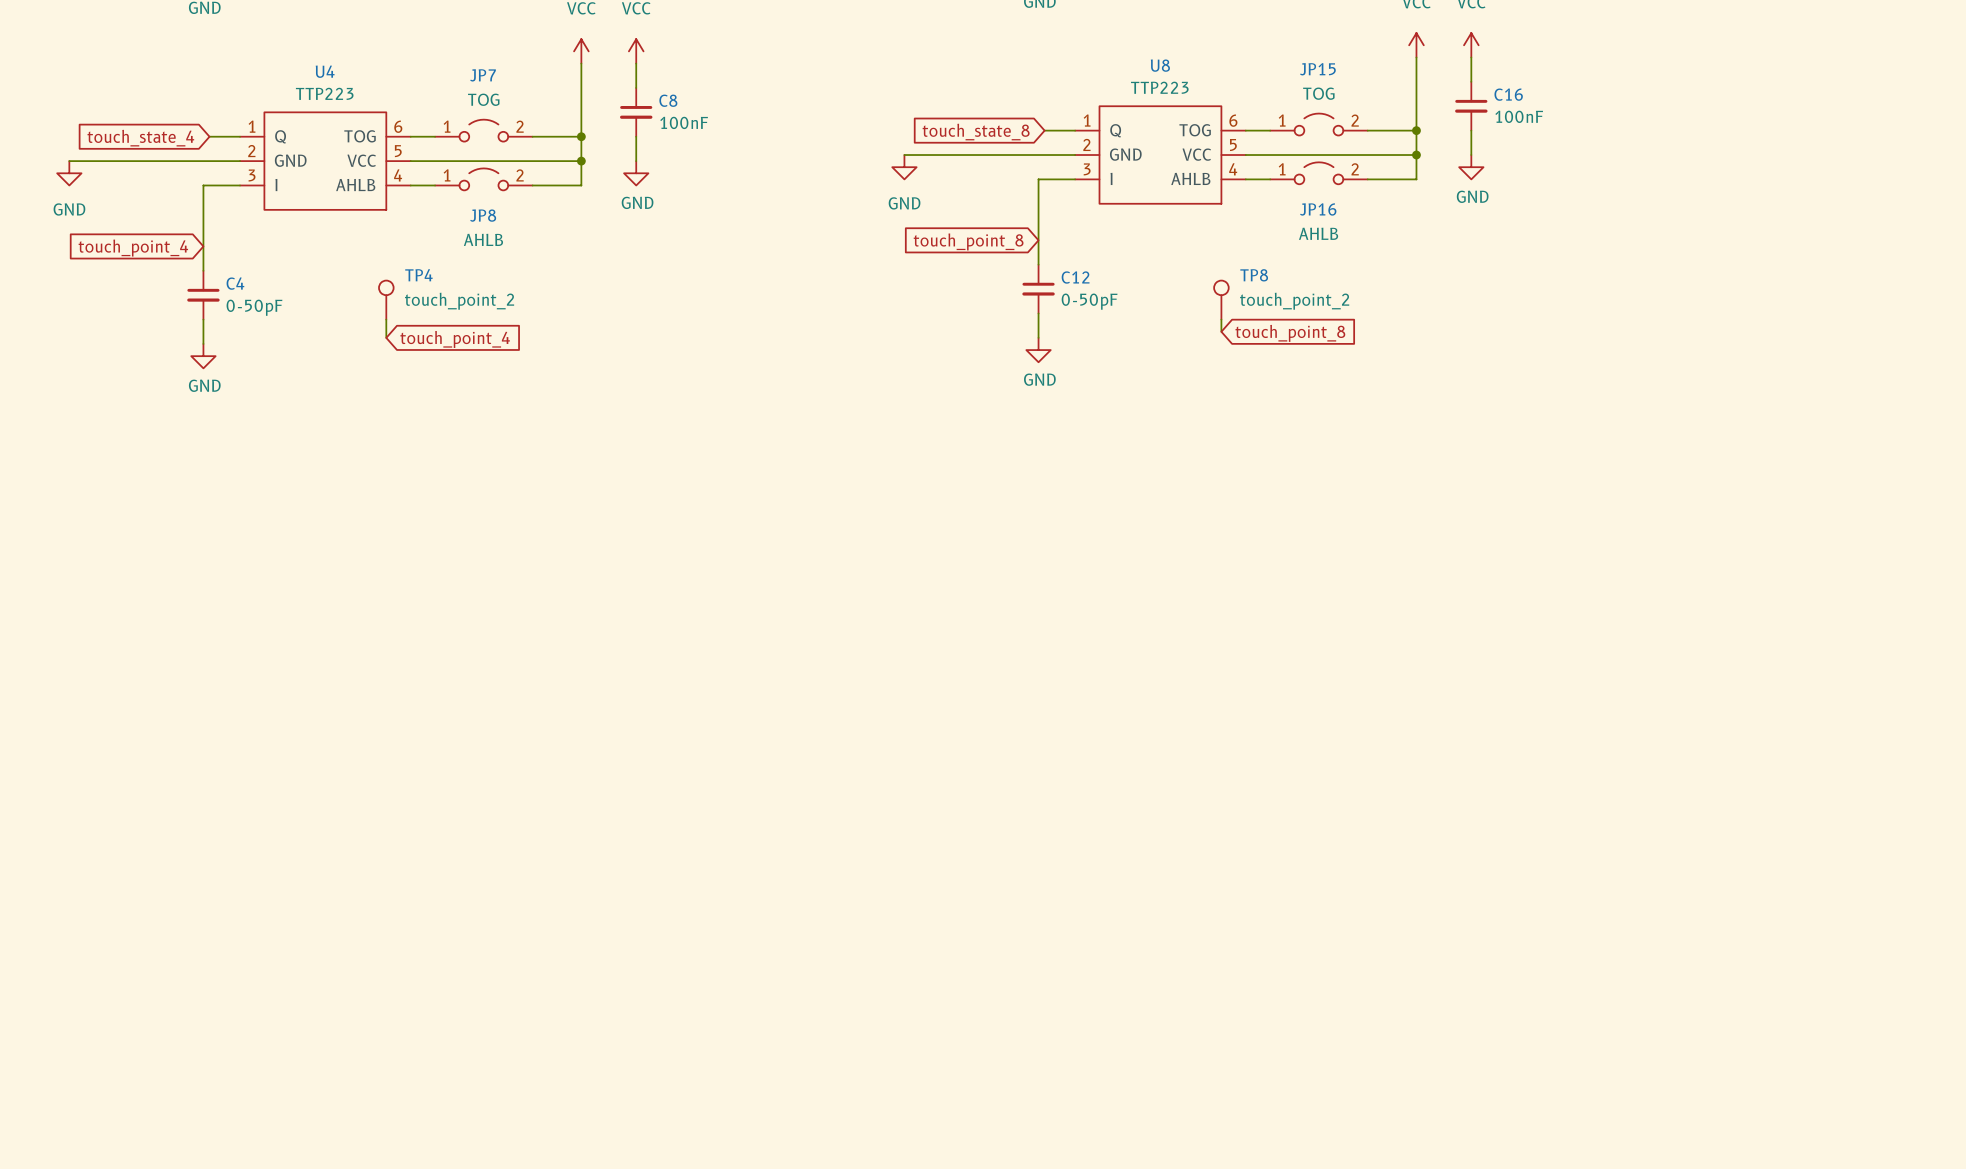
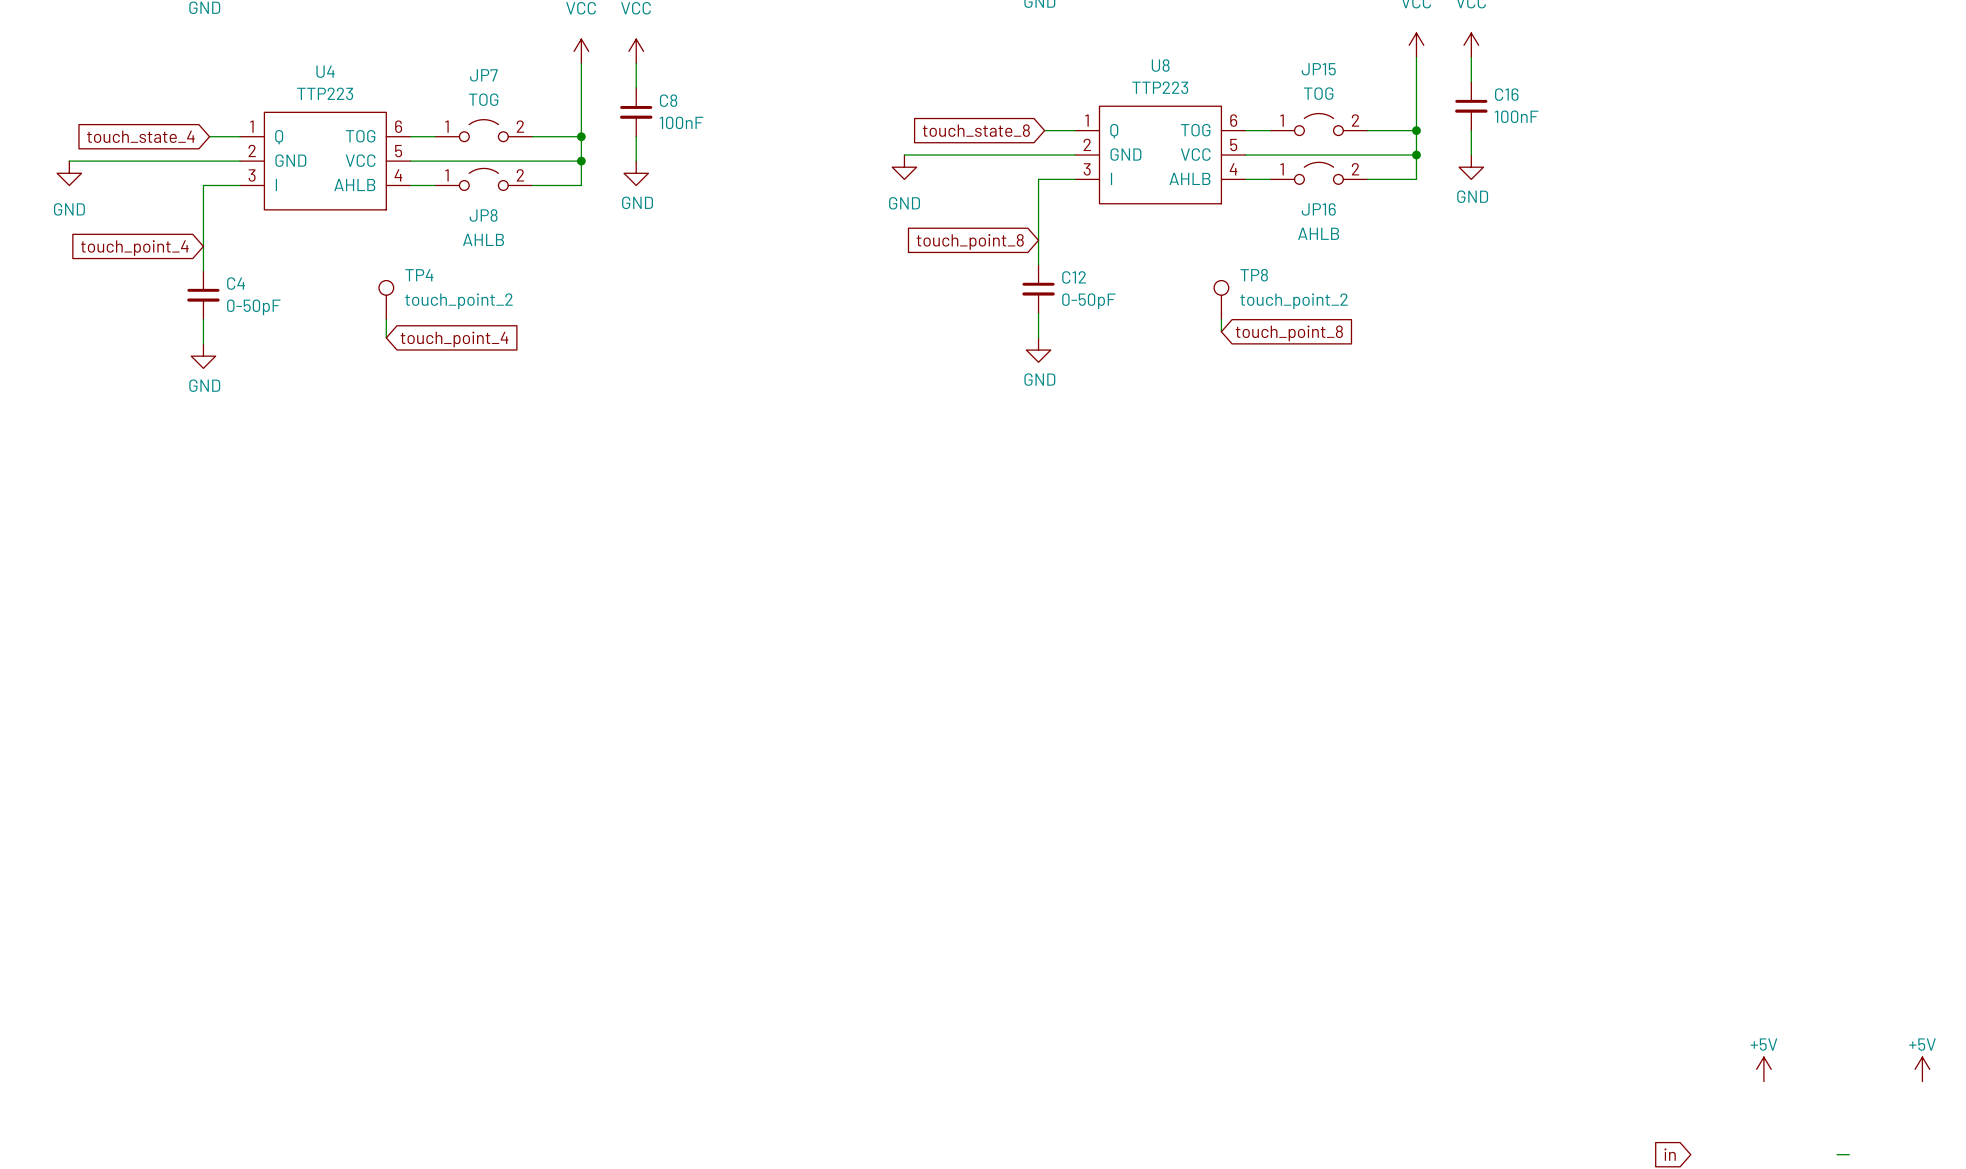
power symbol: none -> +5V (1763, 1069)
power symbol: none -> +5V (1922, 1069)
global label: none -> in (1670, 1154)
wire: none -> (1837, 1154) (1849, 1154)

